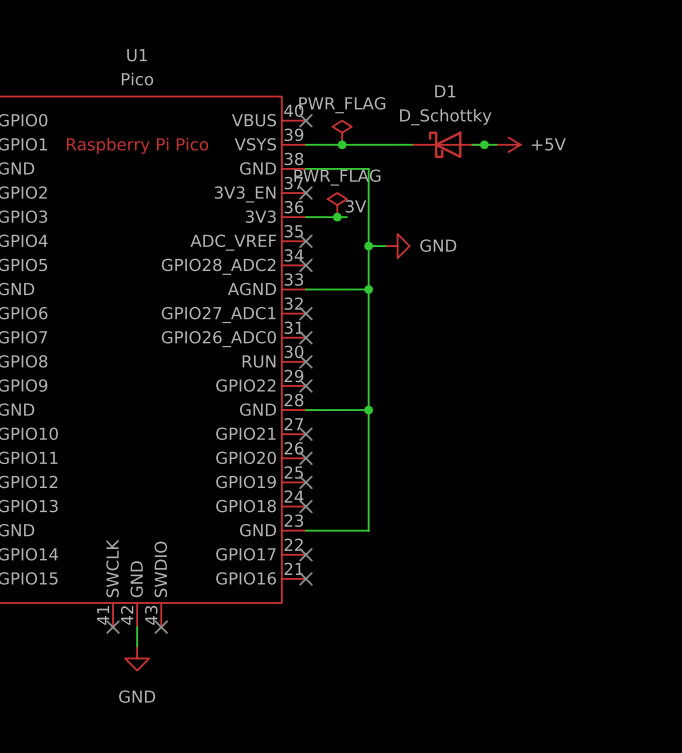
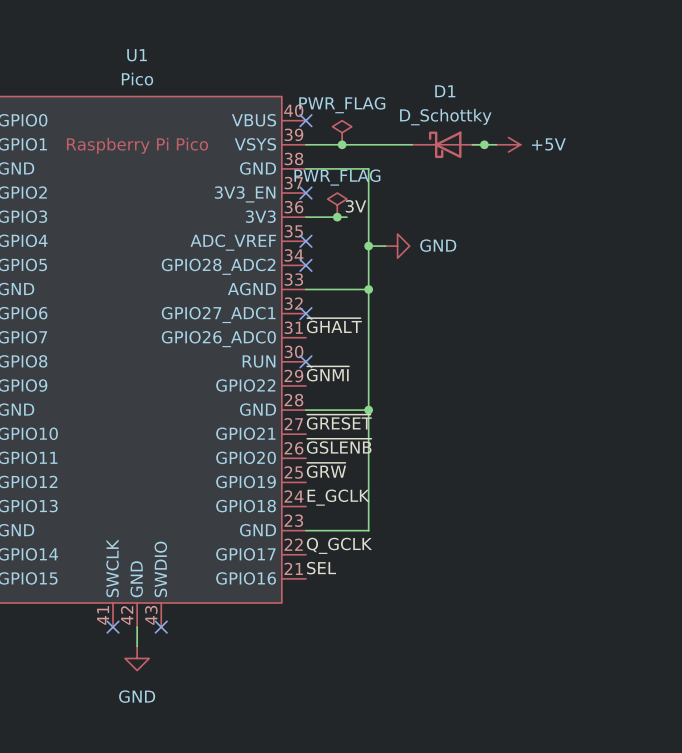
label: none -> ~{GHALT} (334, 325)
no-connect mark: (305, 337) -> none
label: none -> ~{GNMI} (327, 373)
no-connect mark: (305, 385) -> none
label: none -> ~{GRESET} (339, 422)
no-connect mark: (305, 434) -> none
label: none -> ~{GSLENB} (339, 446)
no-connect mark: (305, 458) -> none
label: none -> ~{GRW} (326, 470)
no-connect mark: (305, 482) -> none
label: none -> E_GCLK (338, 497)
no-connect mark: (305, 506) -> none
label: none -> Q_GCLK (339, 545)
no-connect mark: (305, 554) -> none
label: none -> SEL (321, 568)
no-connect mark: (305, 578) -> none

